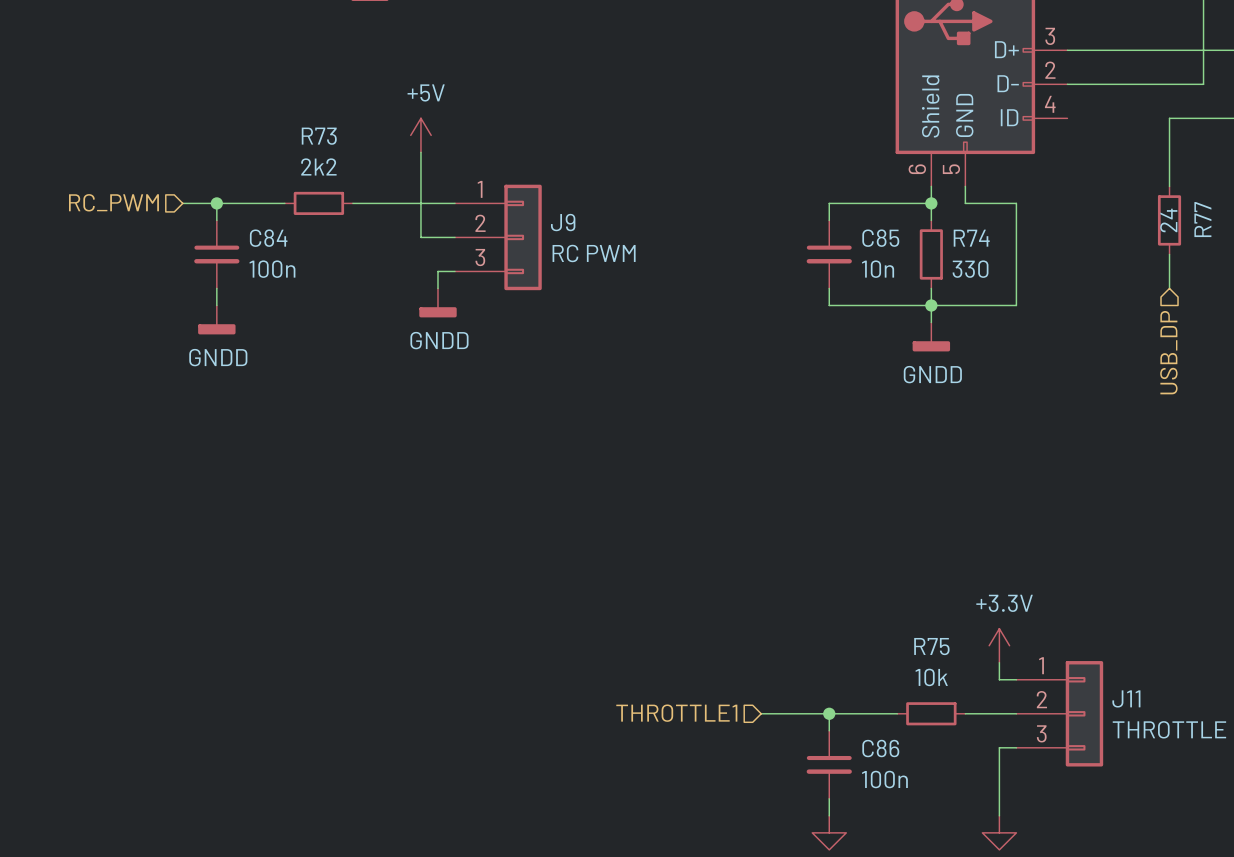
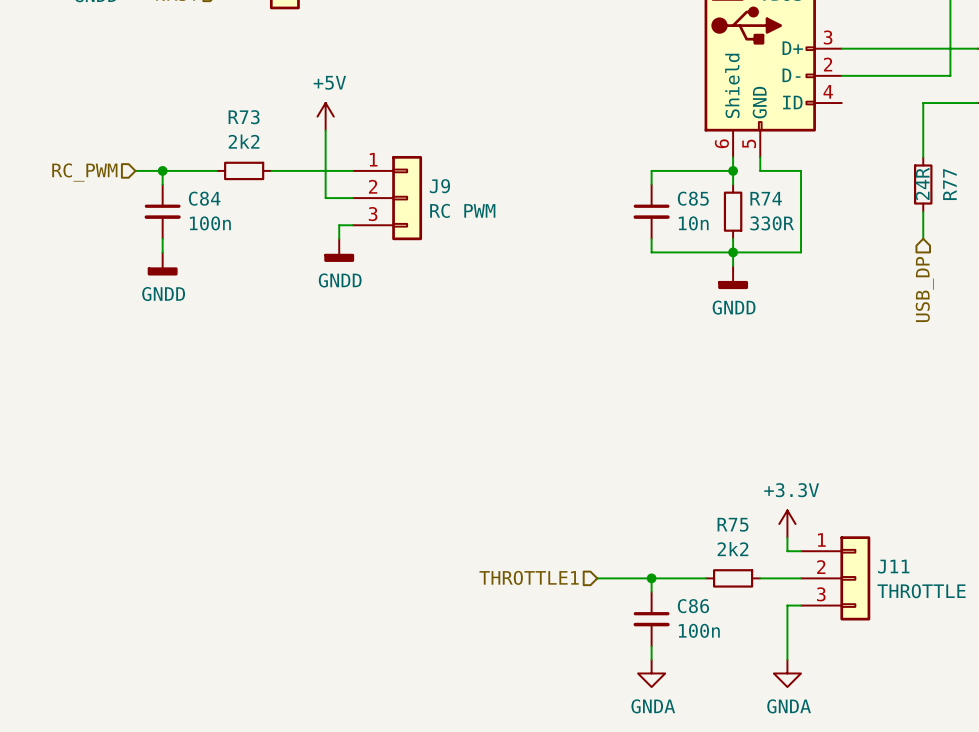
R77 value: 24 (1168, 220) -> 24R (922, 183)
R74 value: 330 (970, 269) -> 330R (772, 223)
R75 value: 10k (931, 677) -> 2k2 (732, 549)

